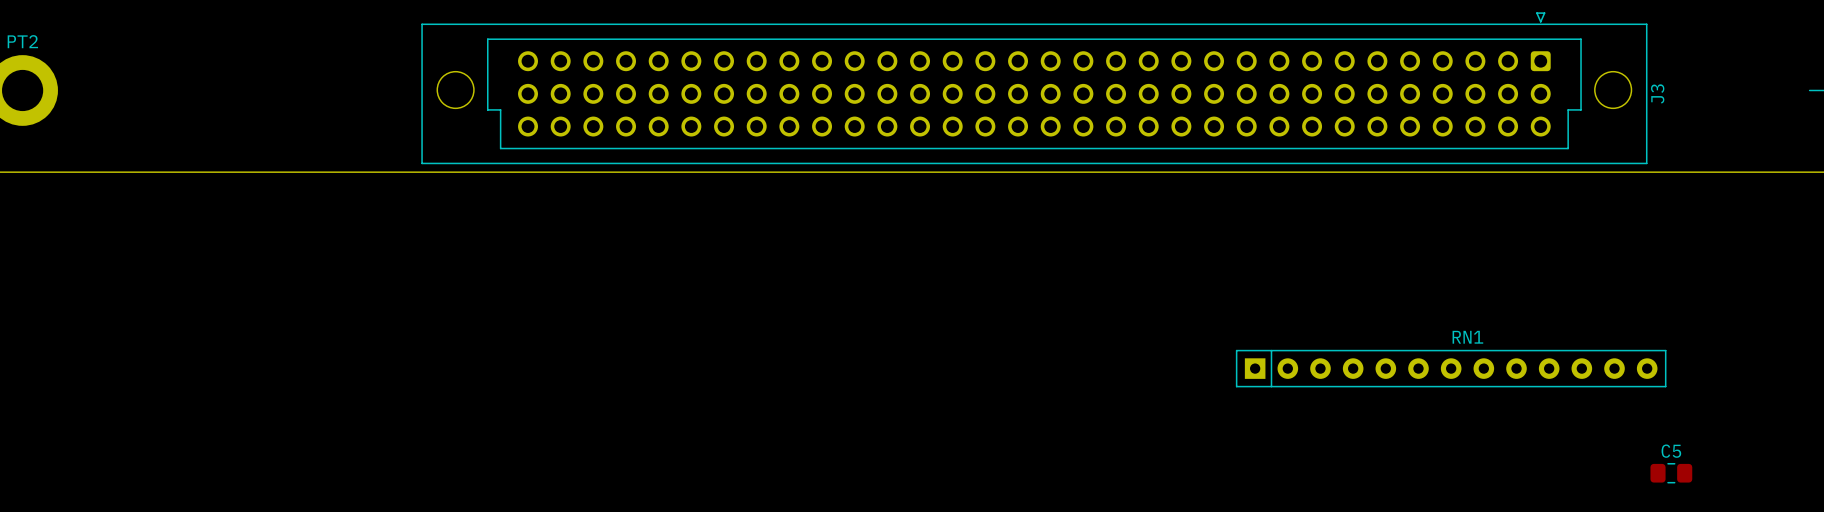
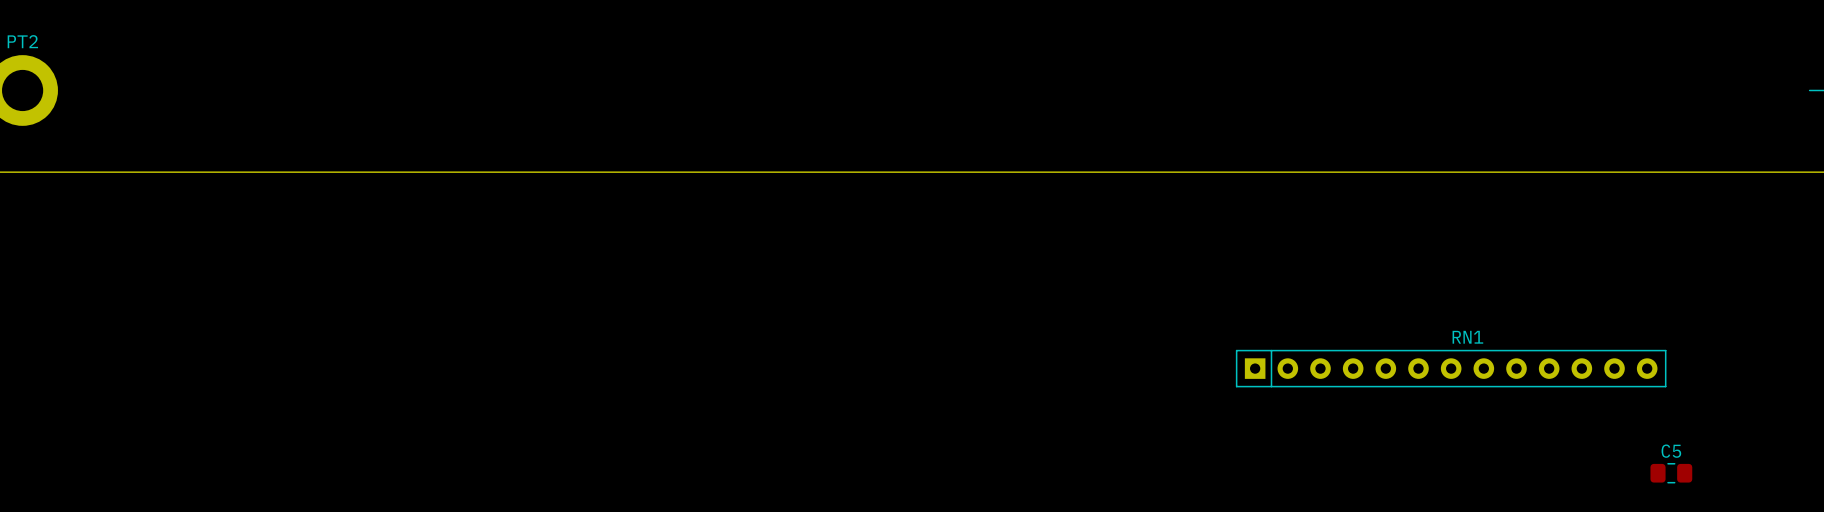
J3: (1034, 88) -> none

